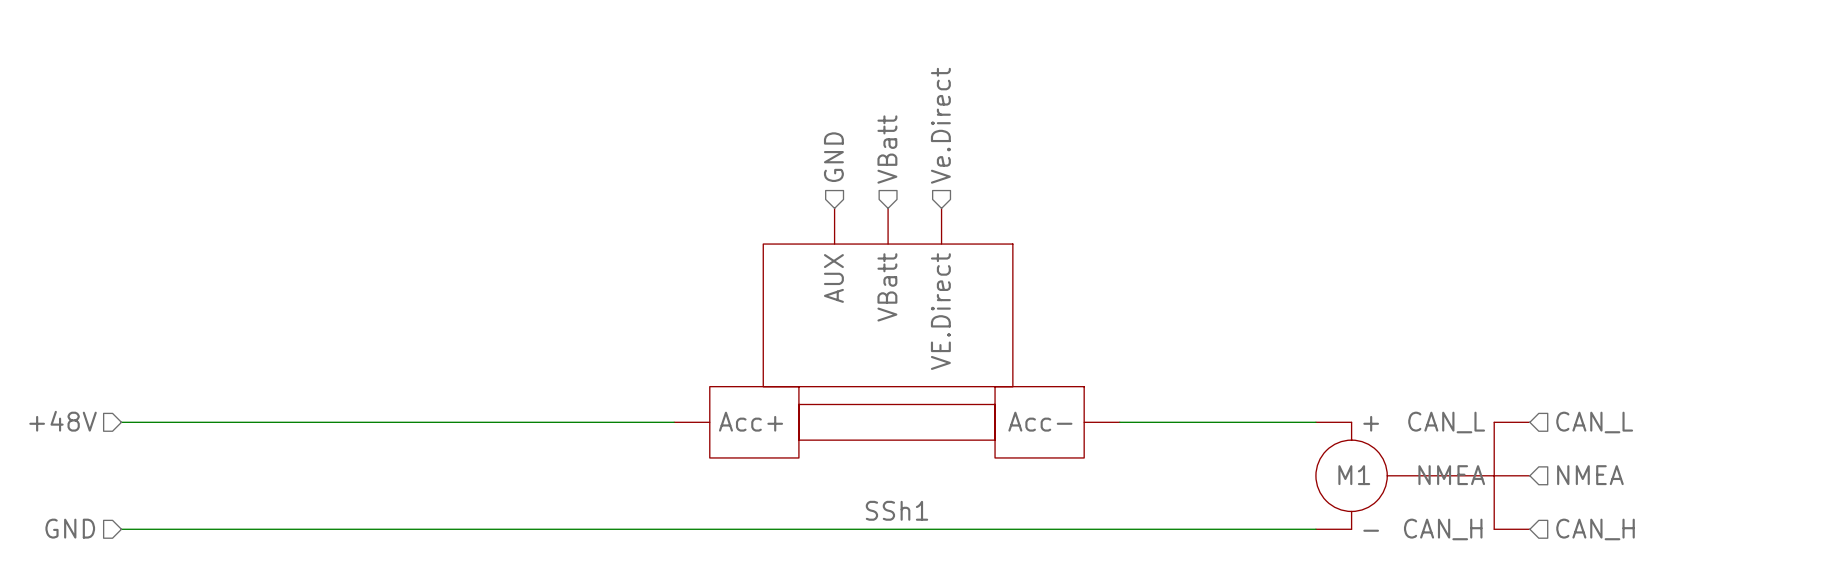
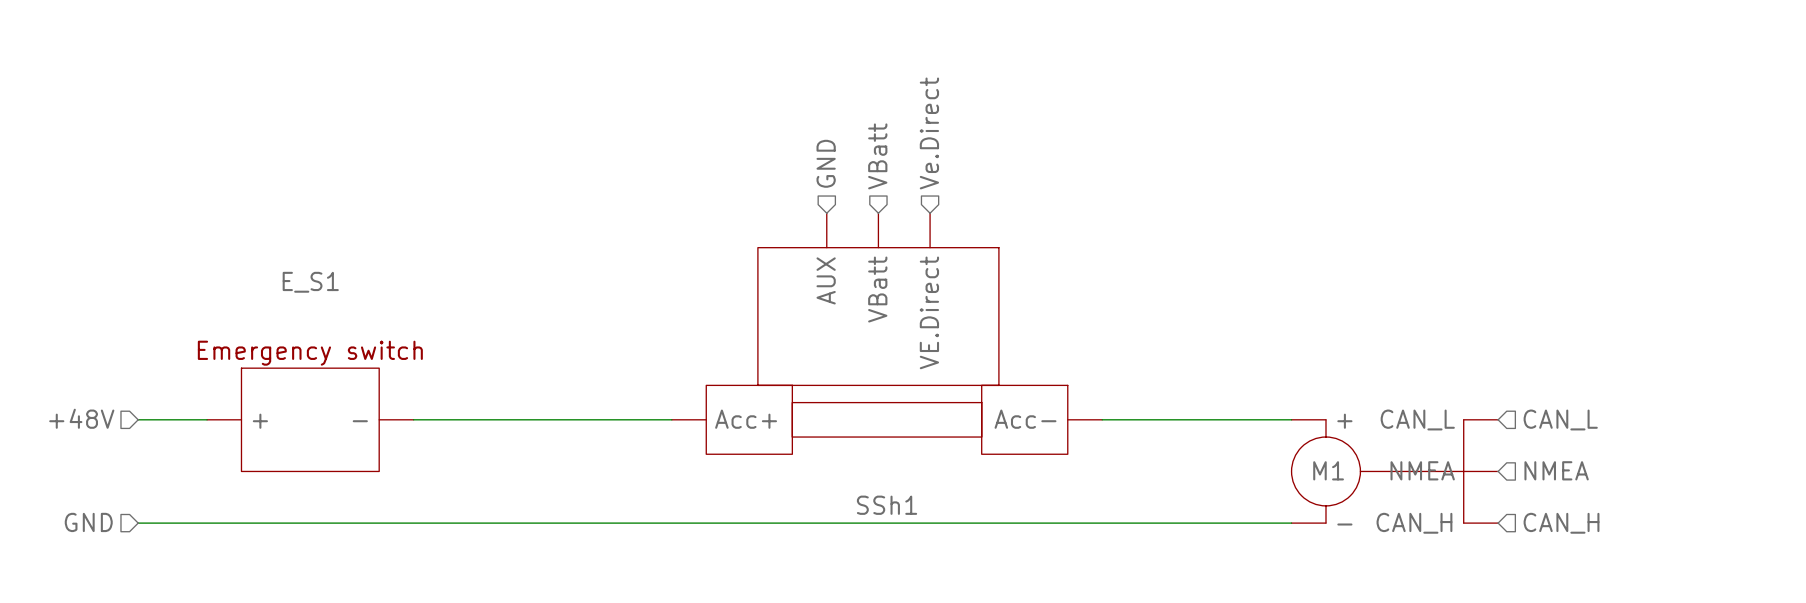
wire: (192, 422) (406, 422) -> none
E_S1: none -> (310, 419)

